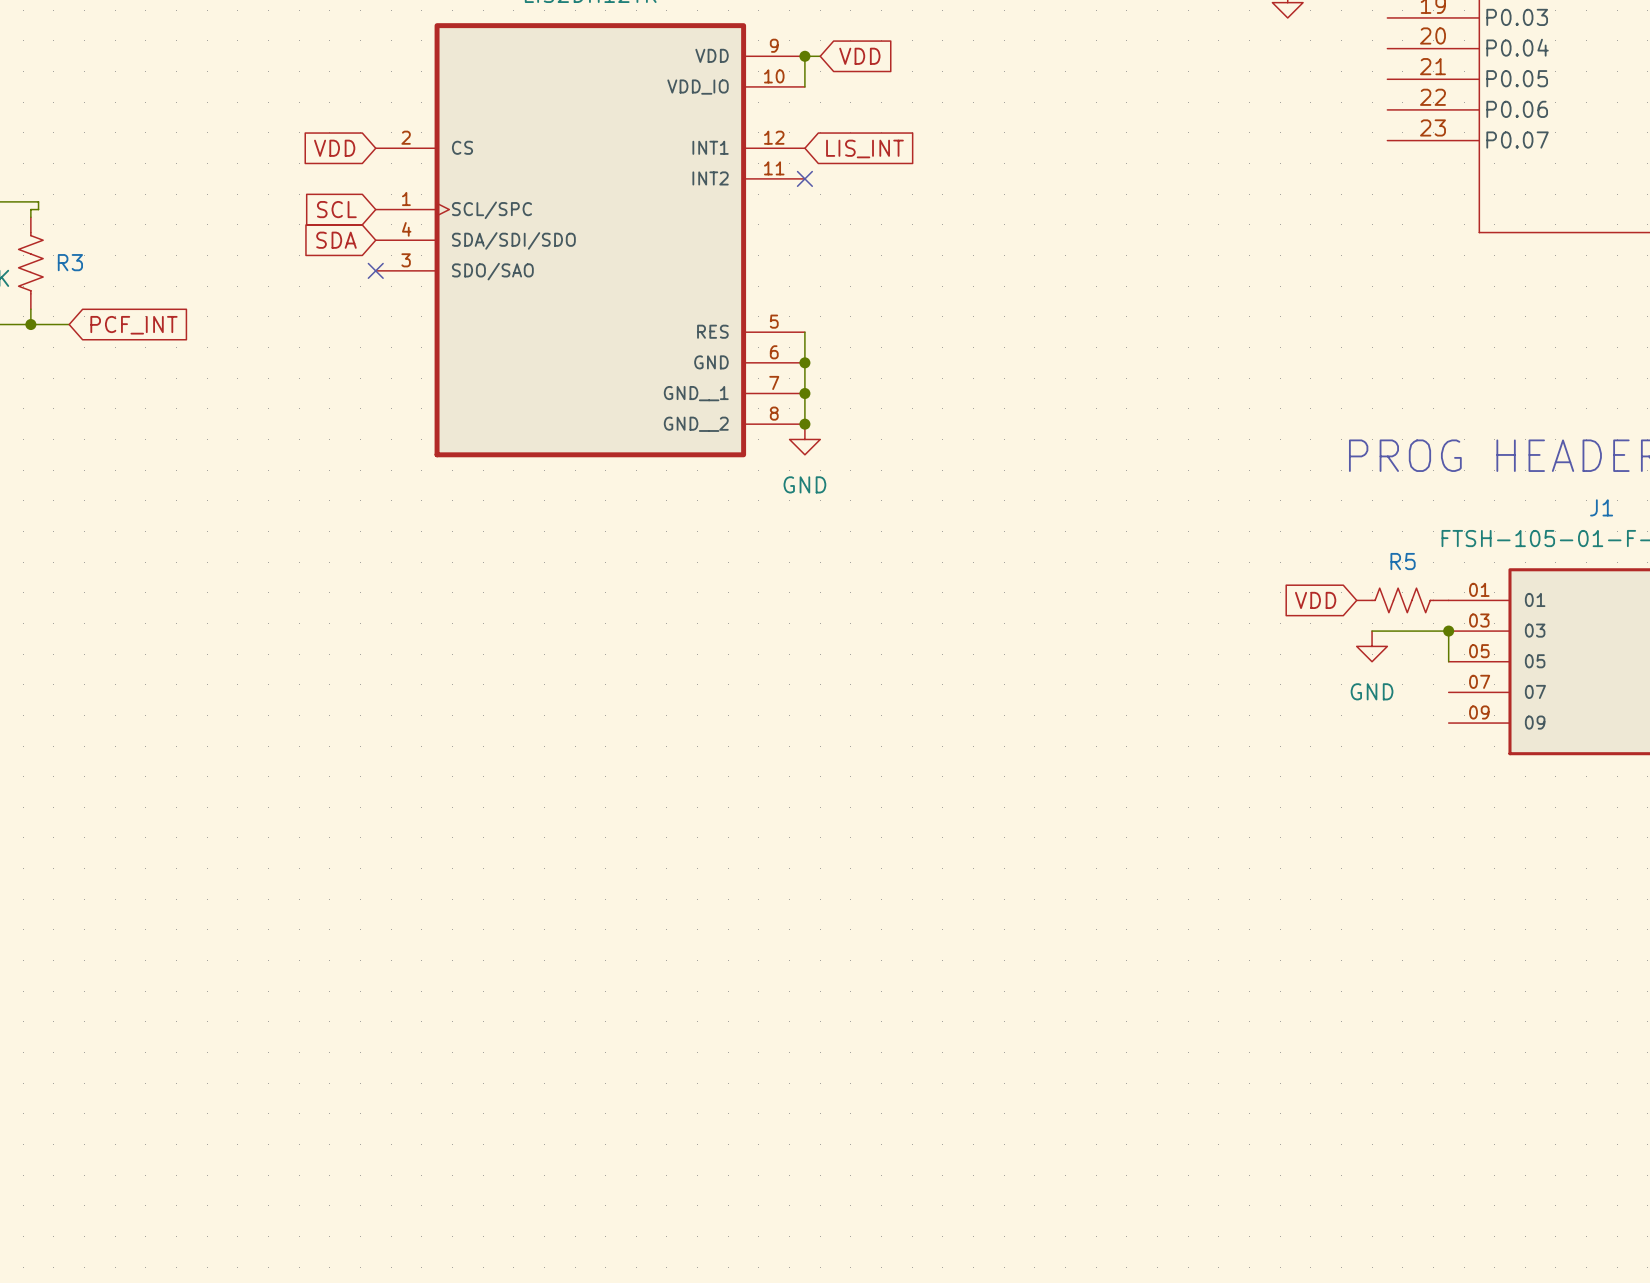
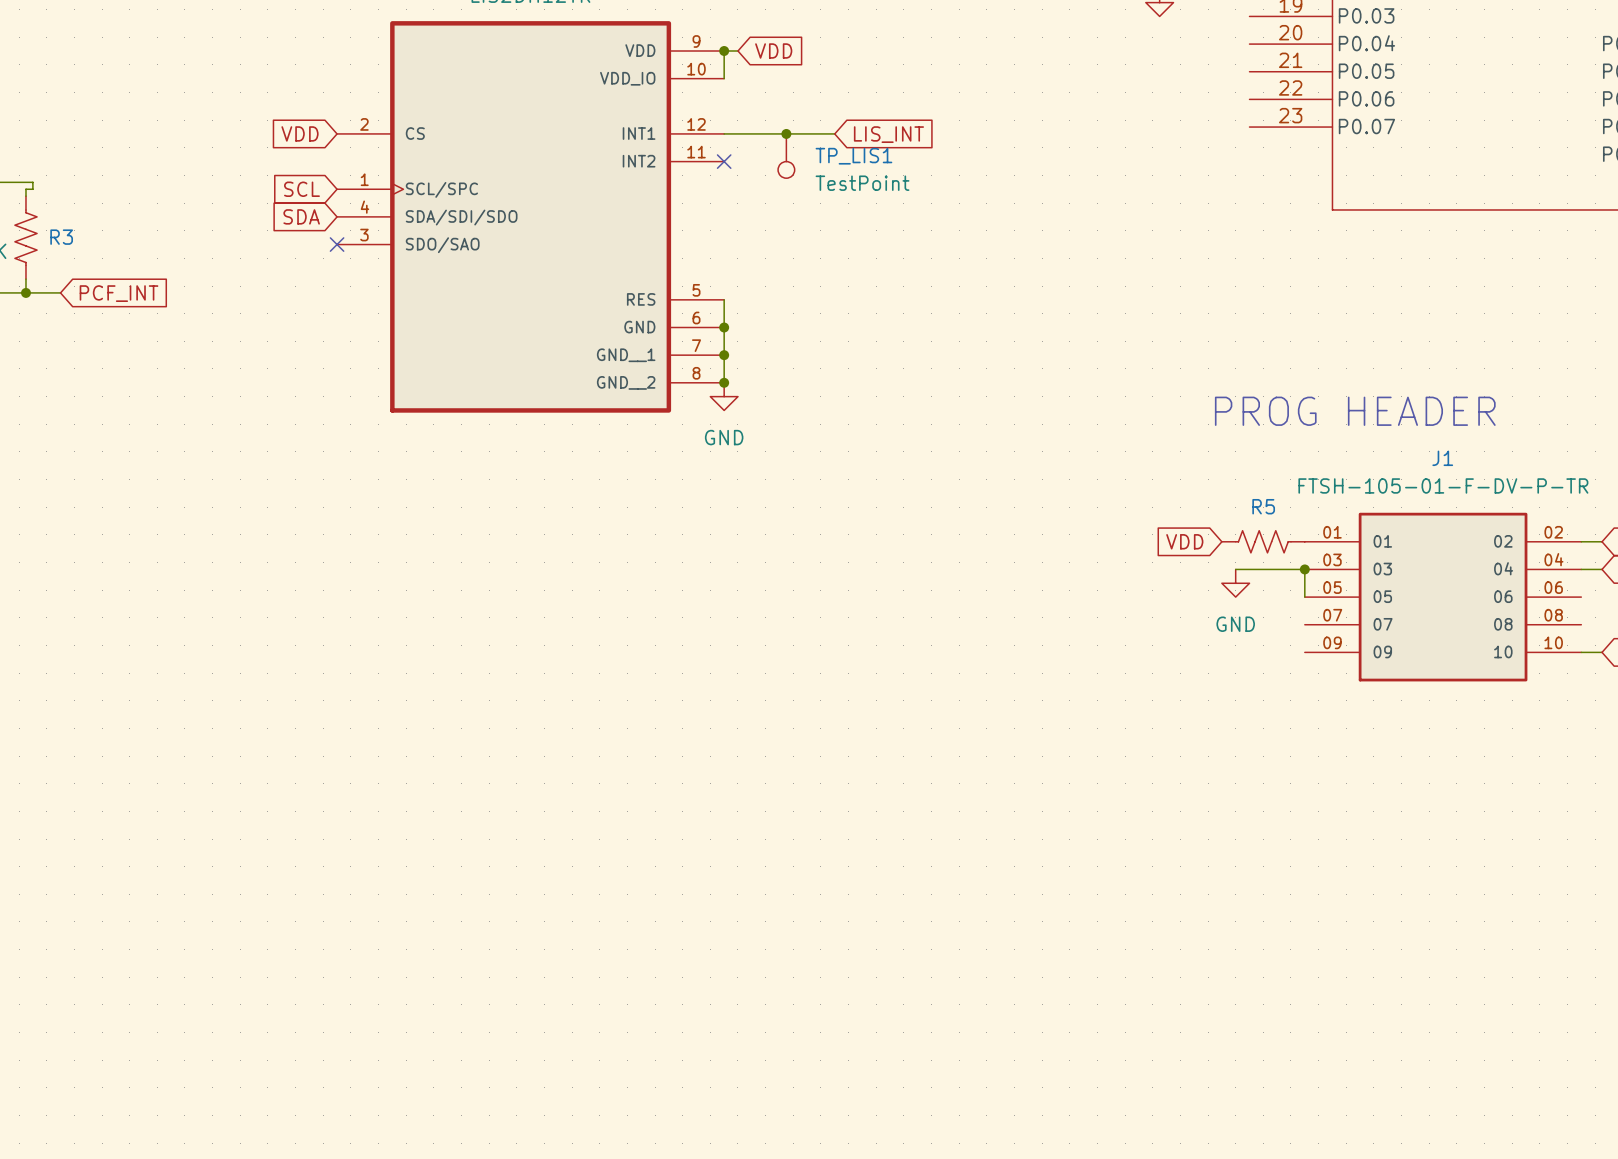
wire: none -> (724, 133) (834, 133)
global label position: LIS_INT (864, 148) -> LIS_INT (888, 134)
junction: none -> (786, 133)
TP_LIS1: none -> TestPoint (786, 156)

